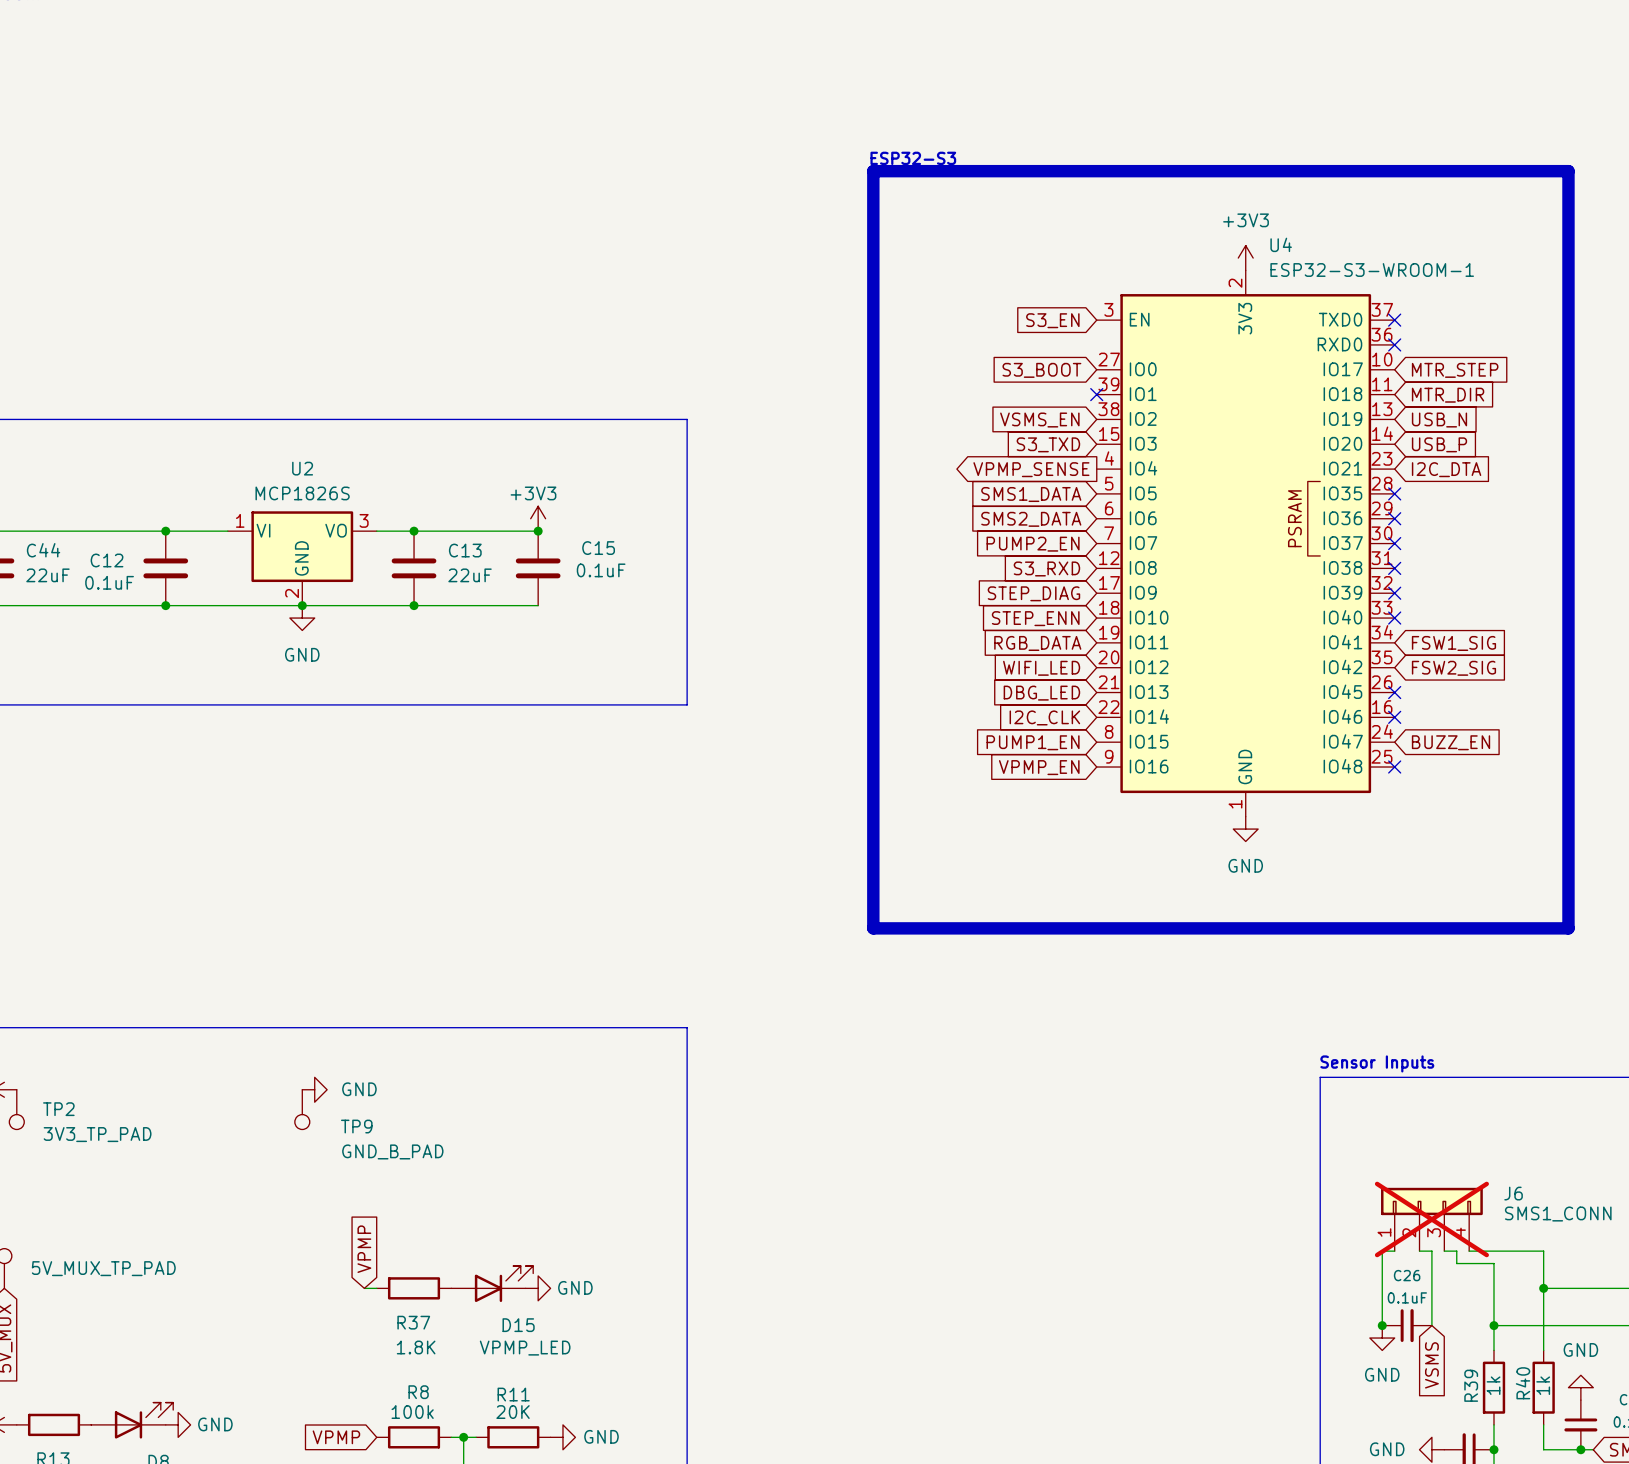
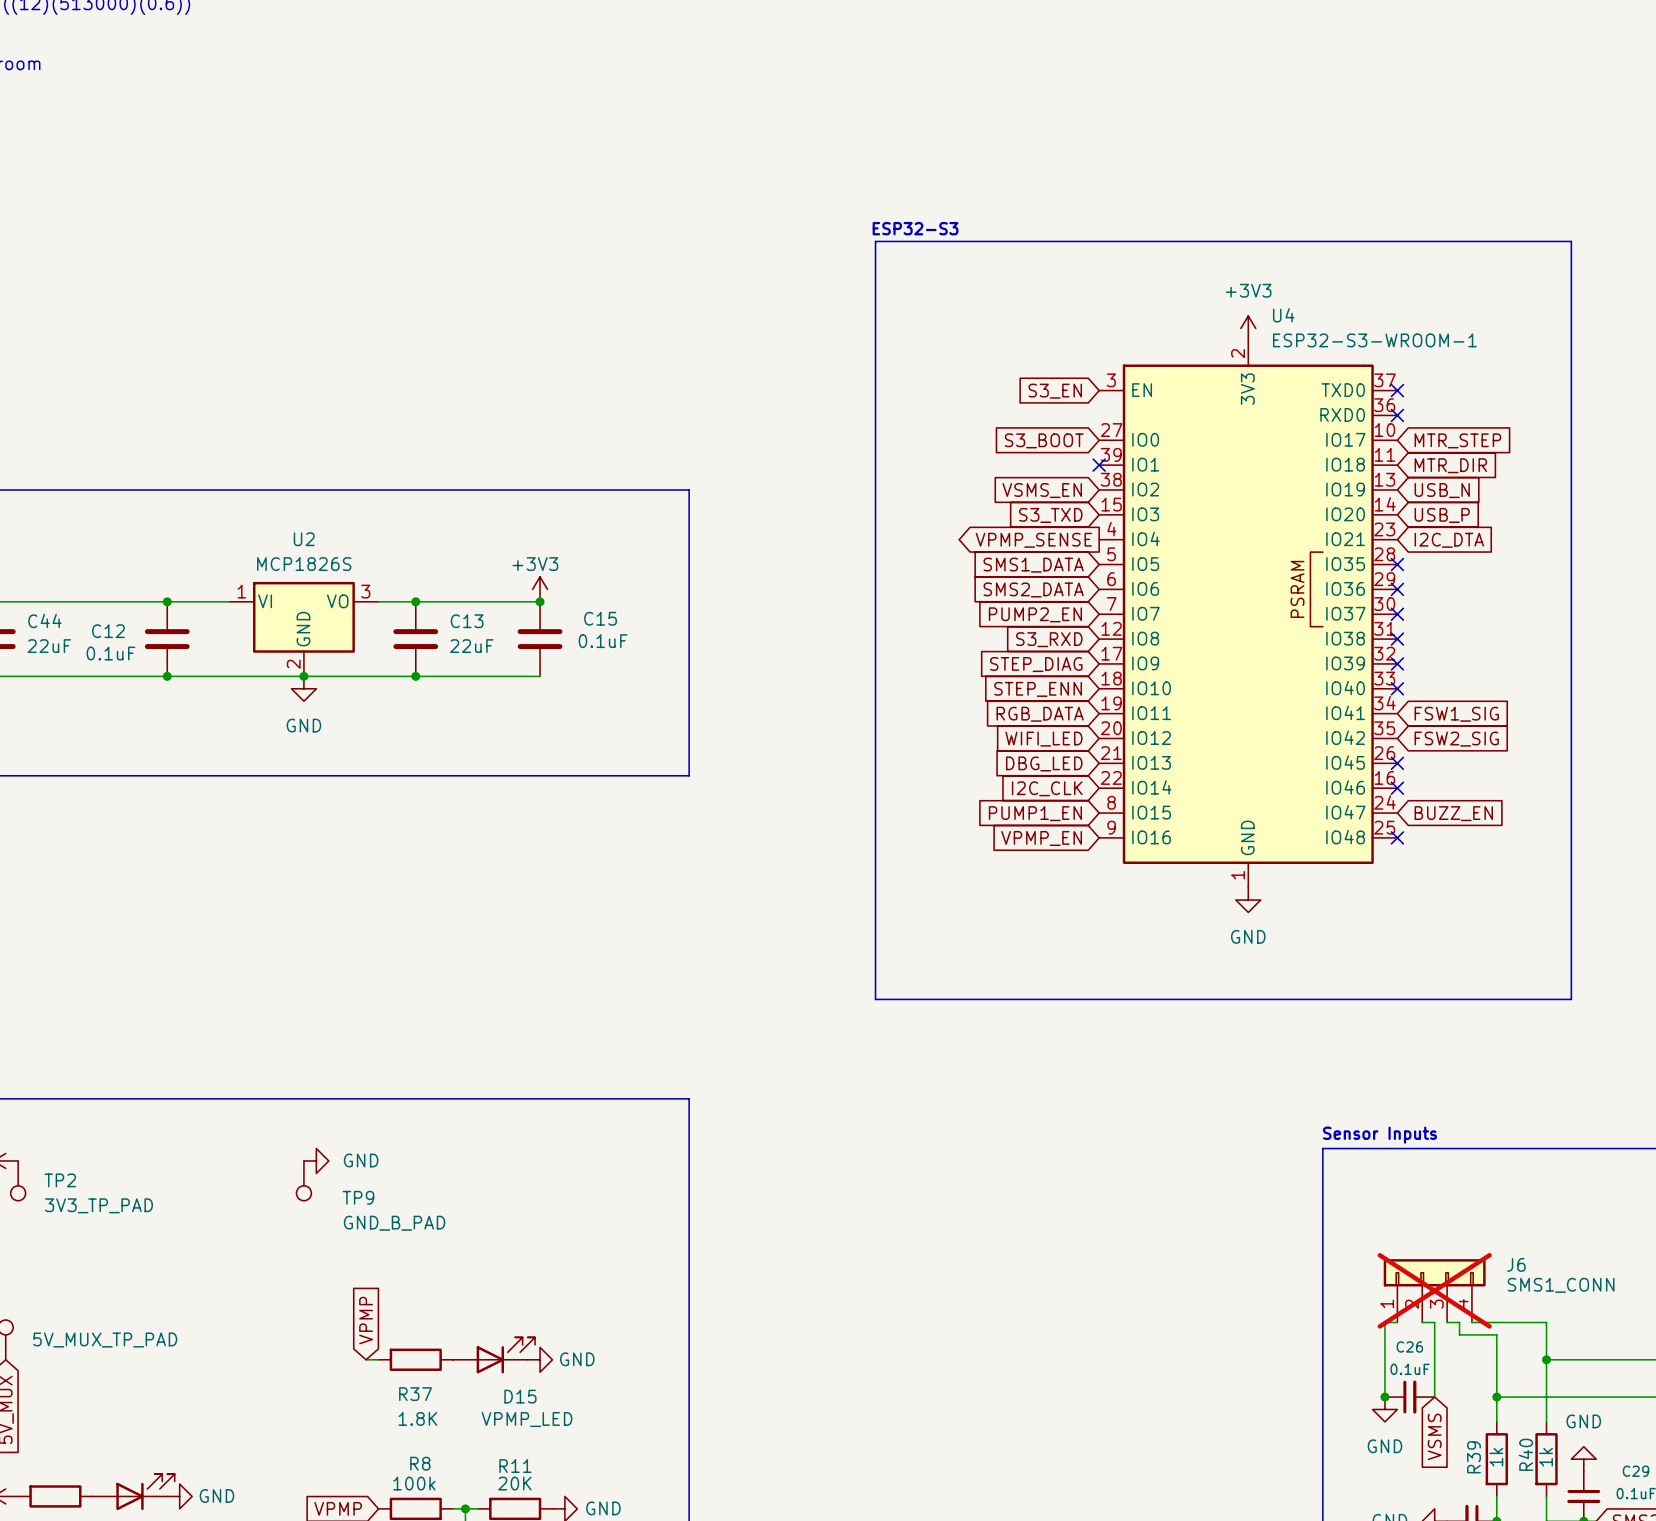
line width: thick (873, 171) (1568, 171) (1568, 928) (873, 928) (873, 171) -> thin (875, 241) (1571, 241) (1571, 999) (875, 999) (875, 241)

